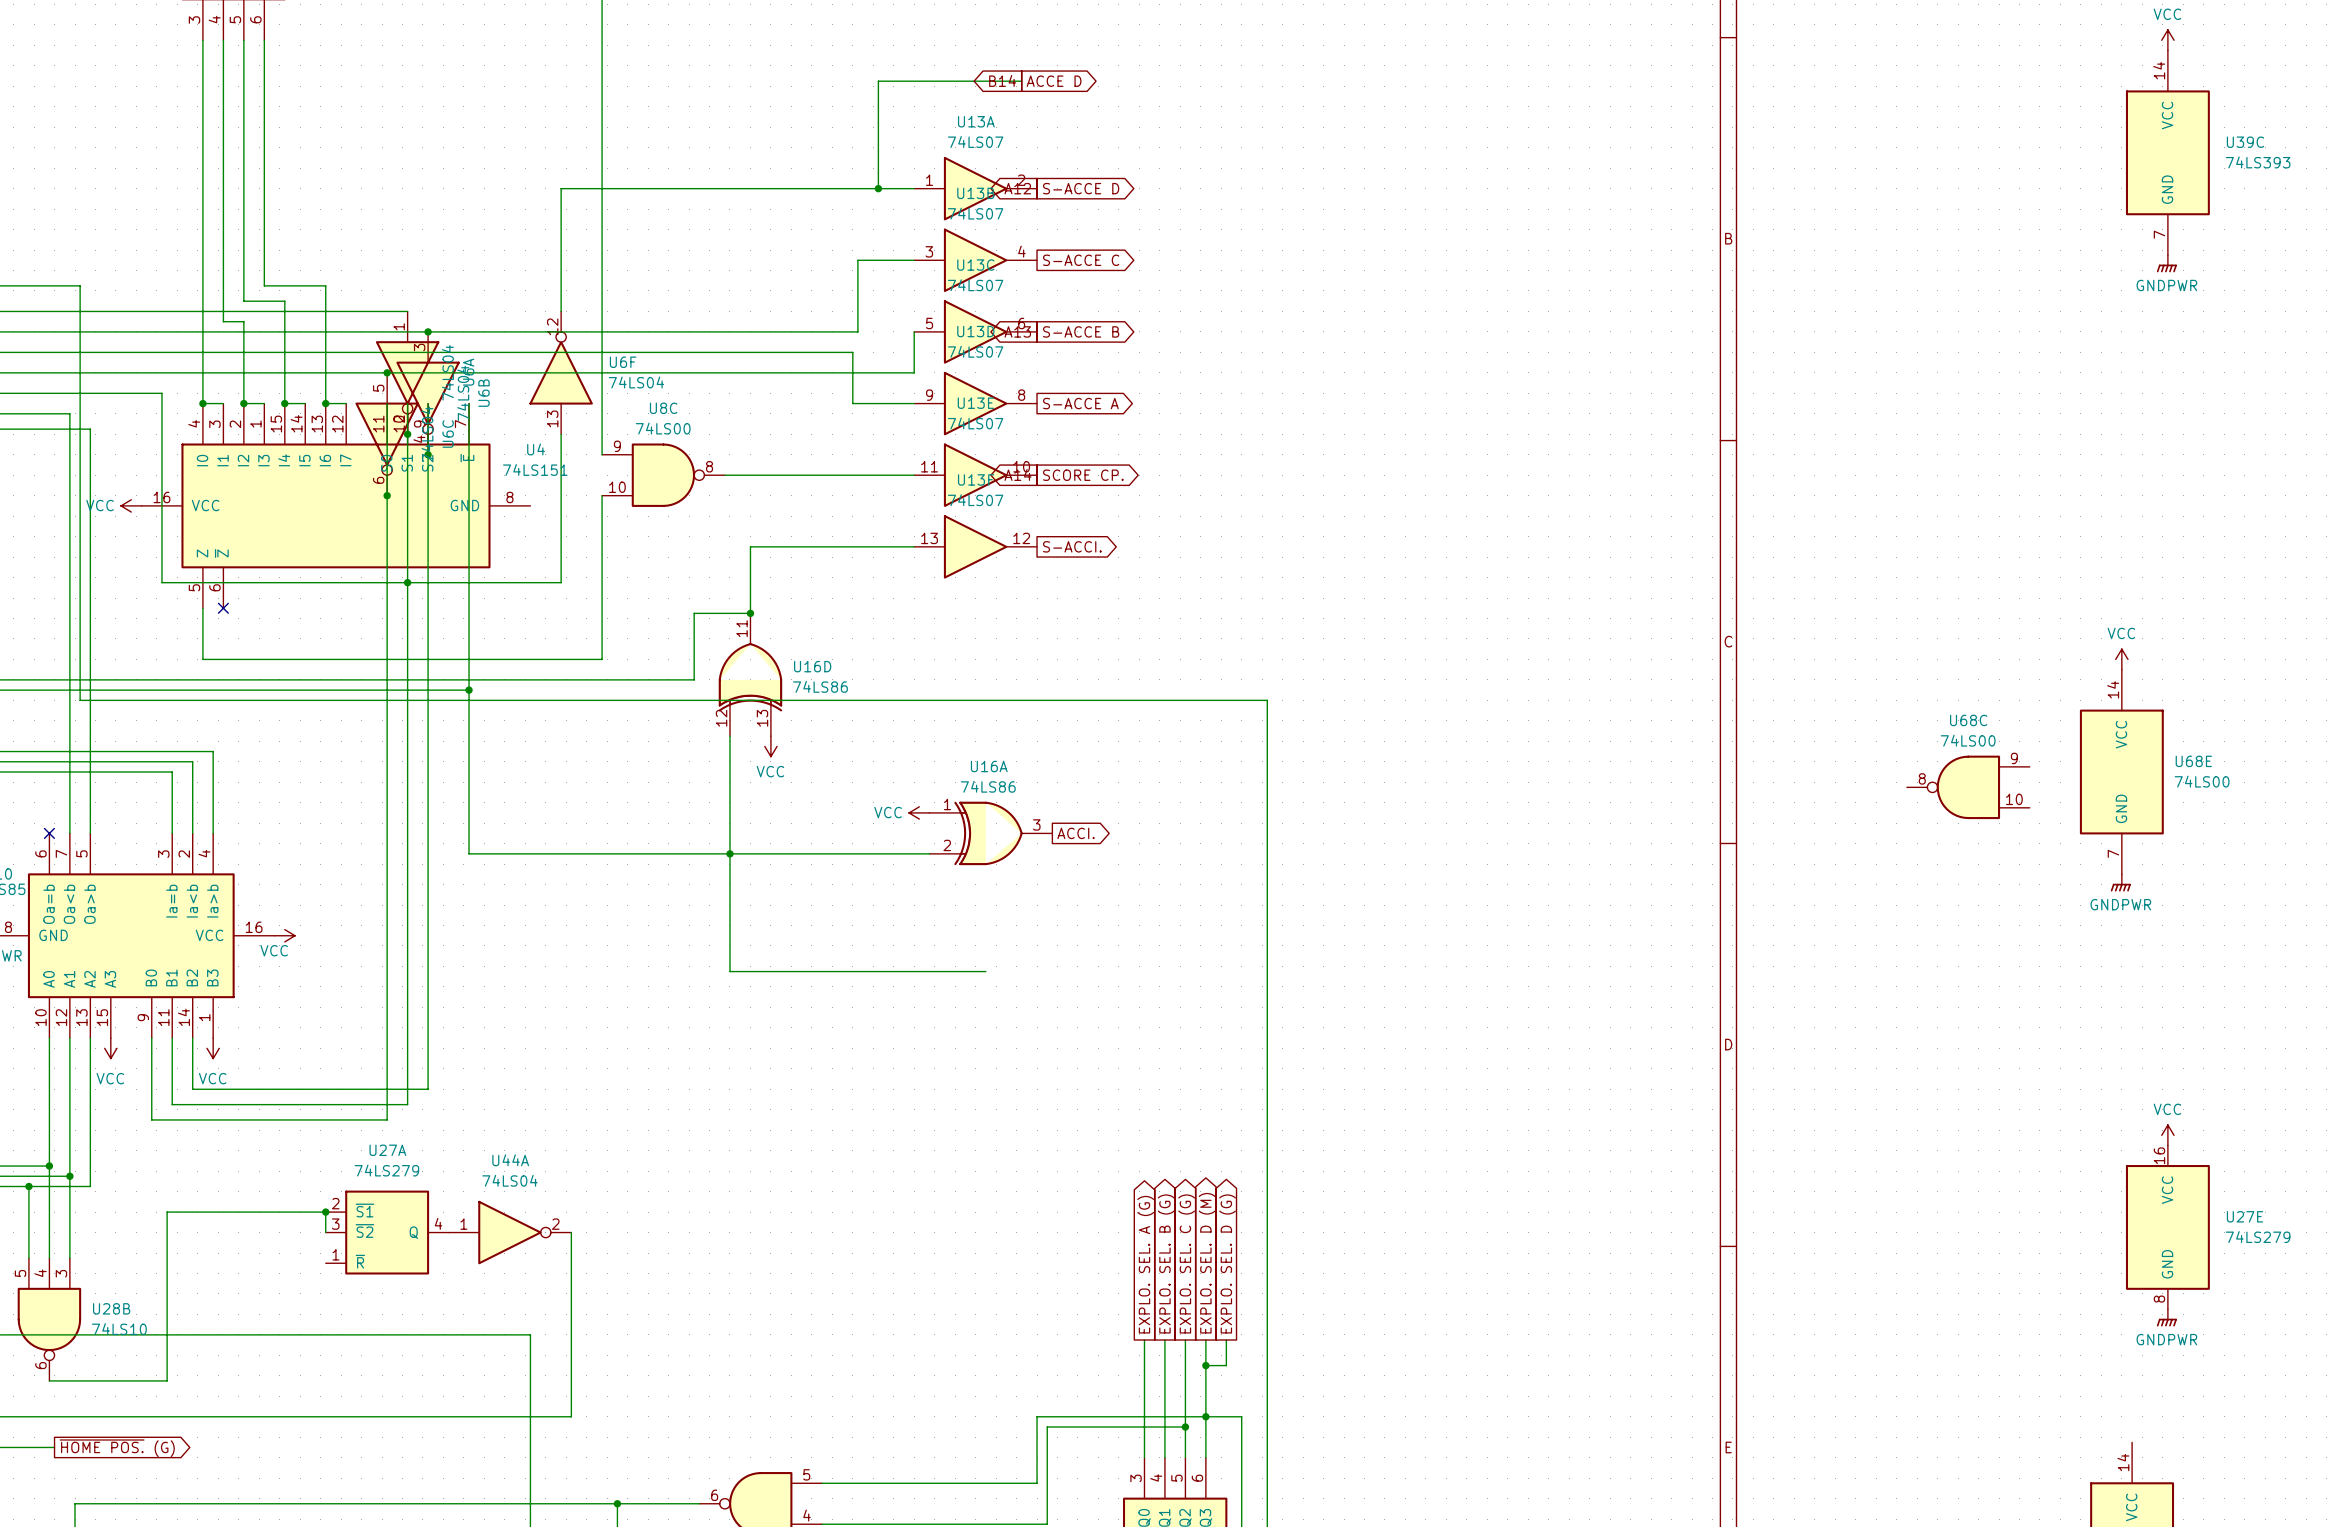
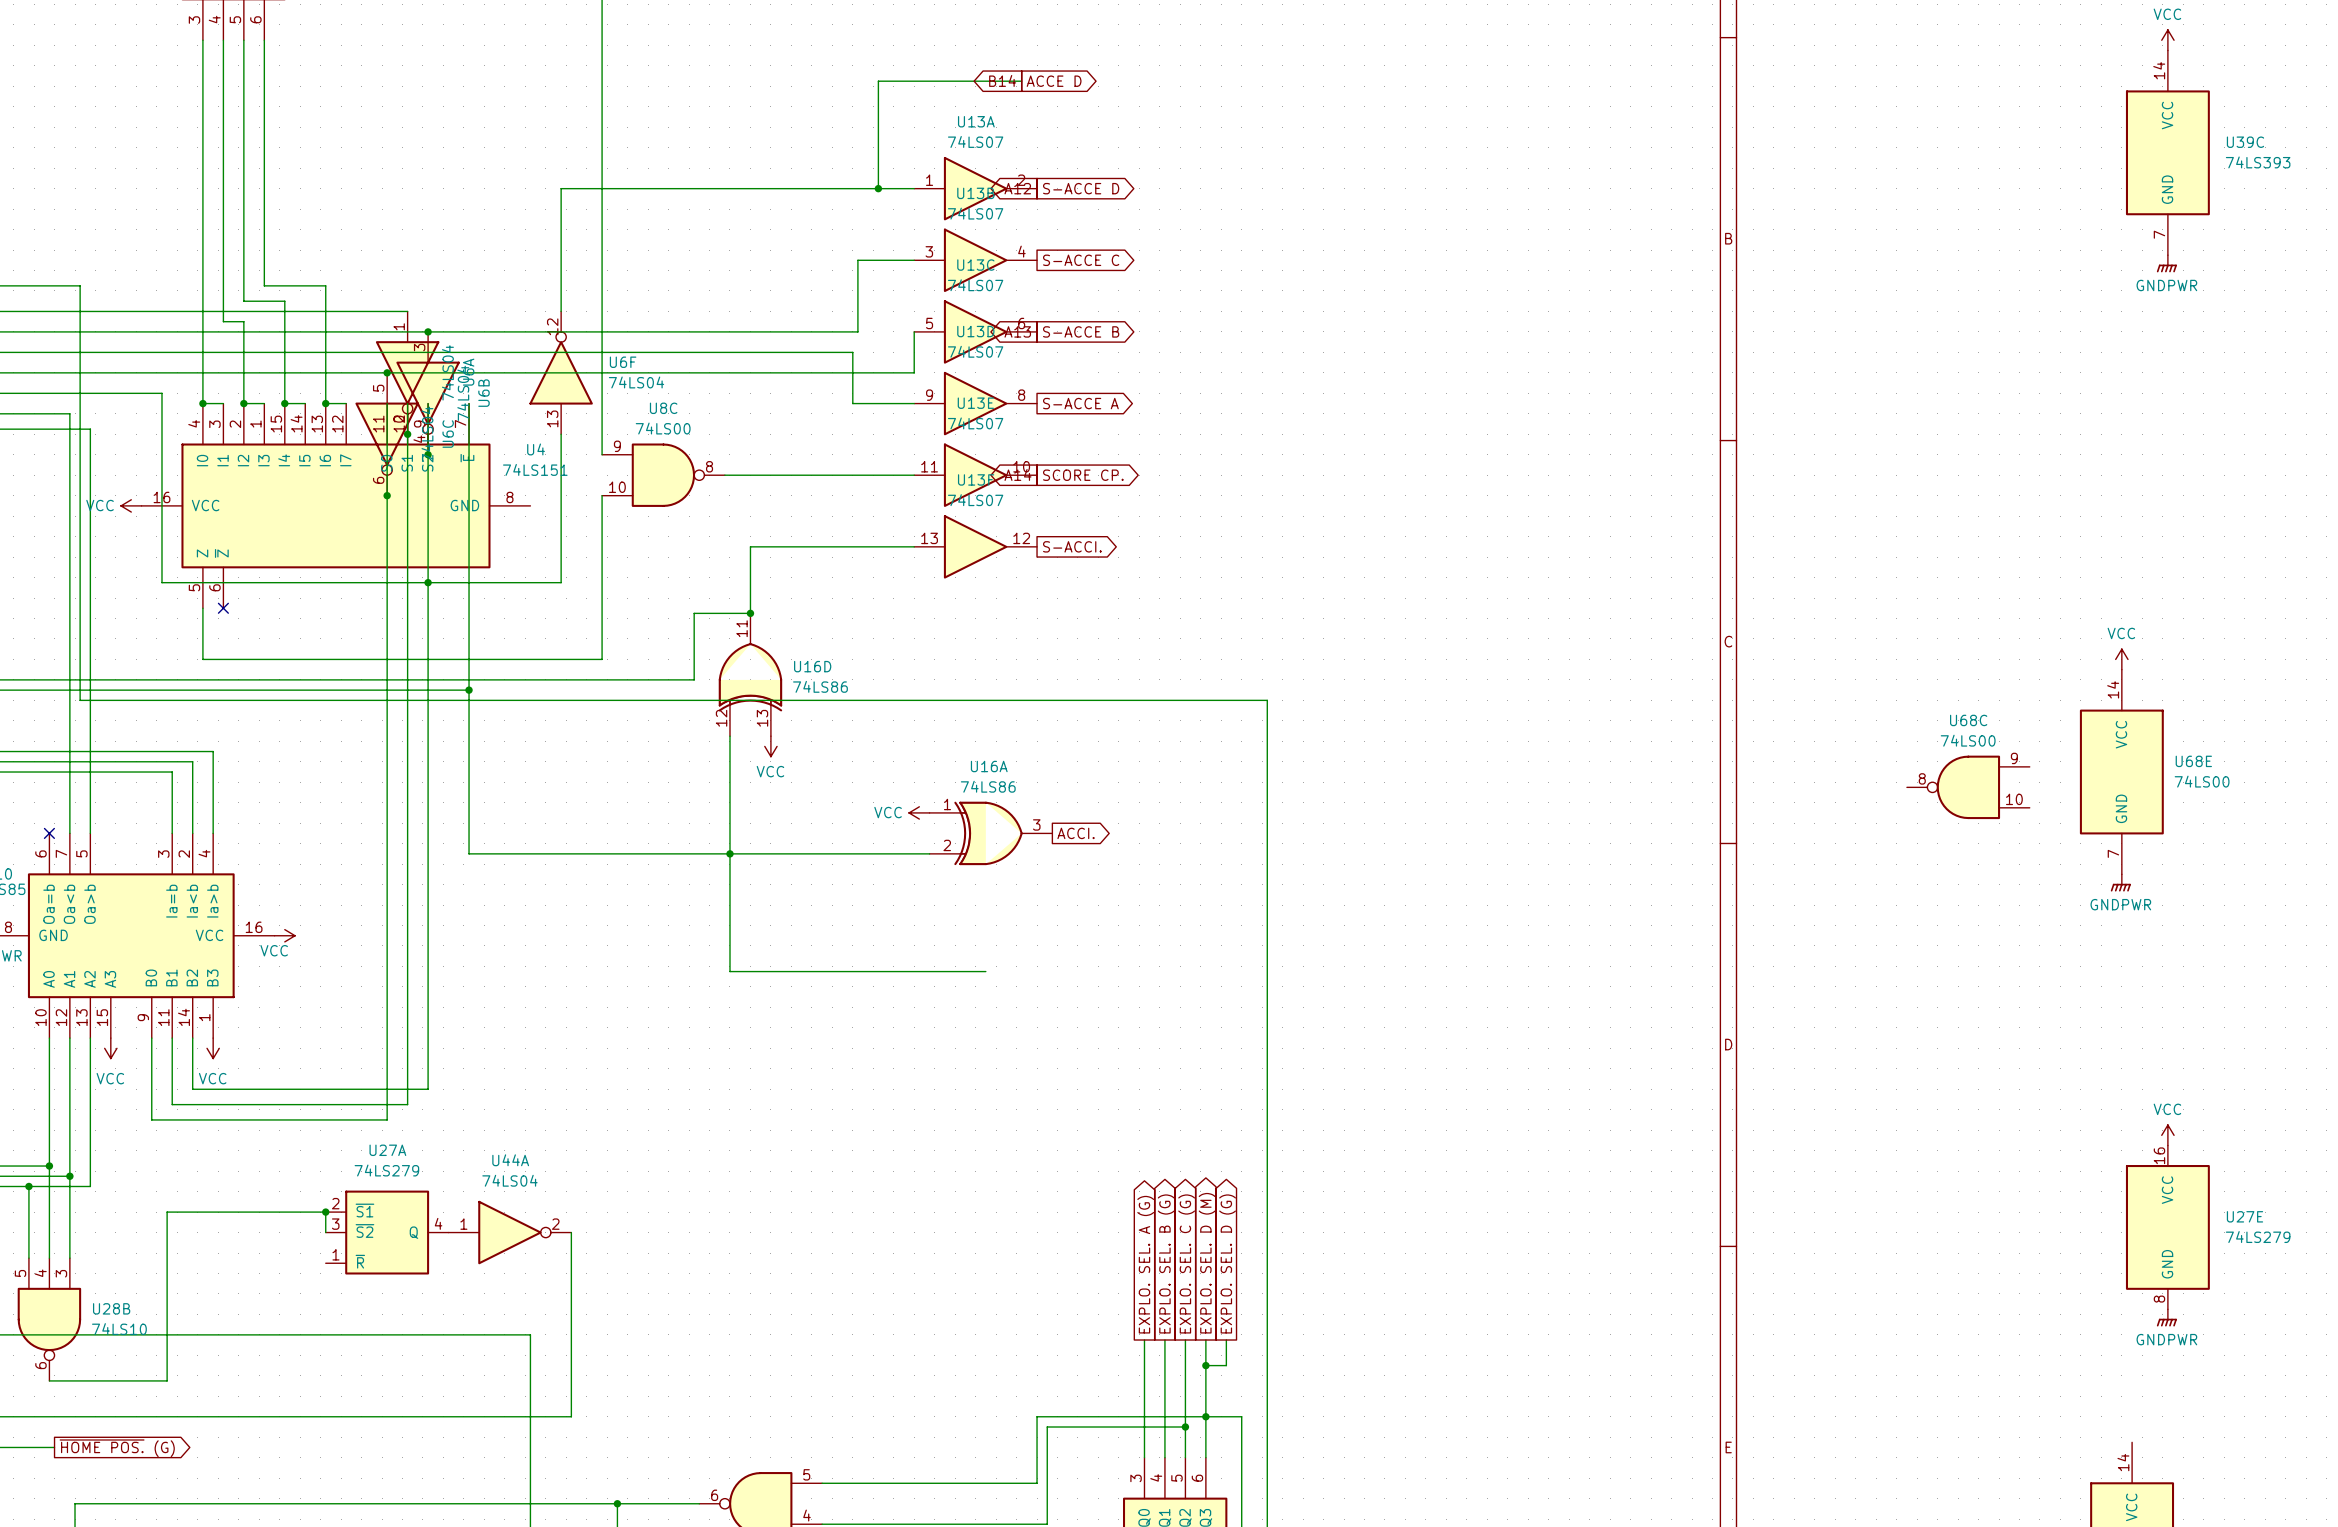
junction position: (407, 582) -> (428, 582)

